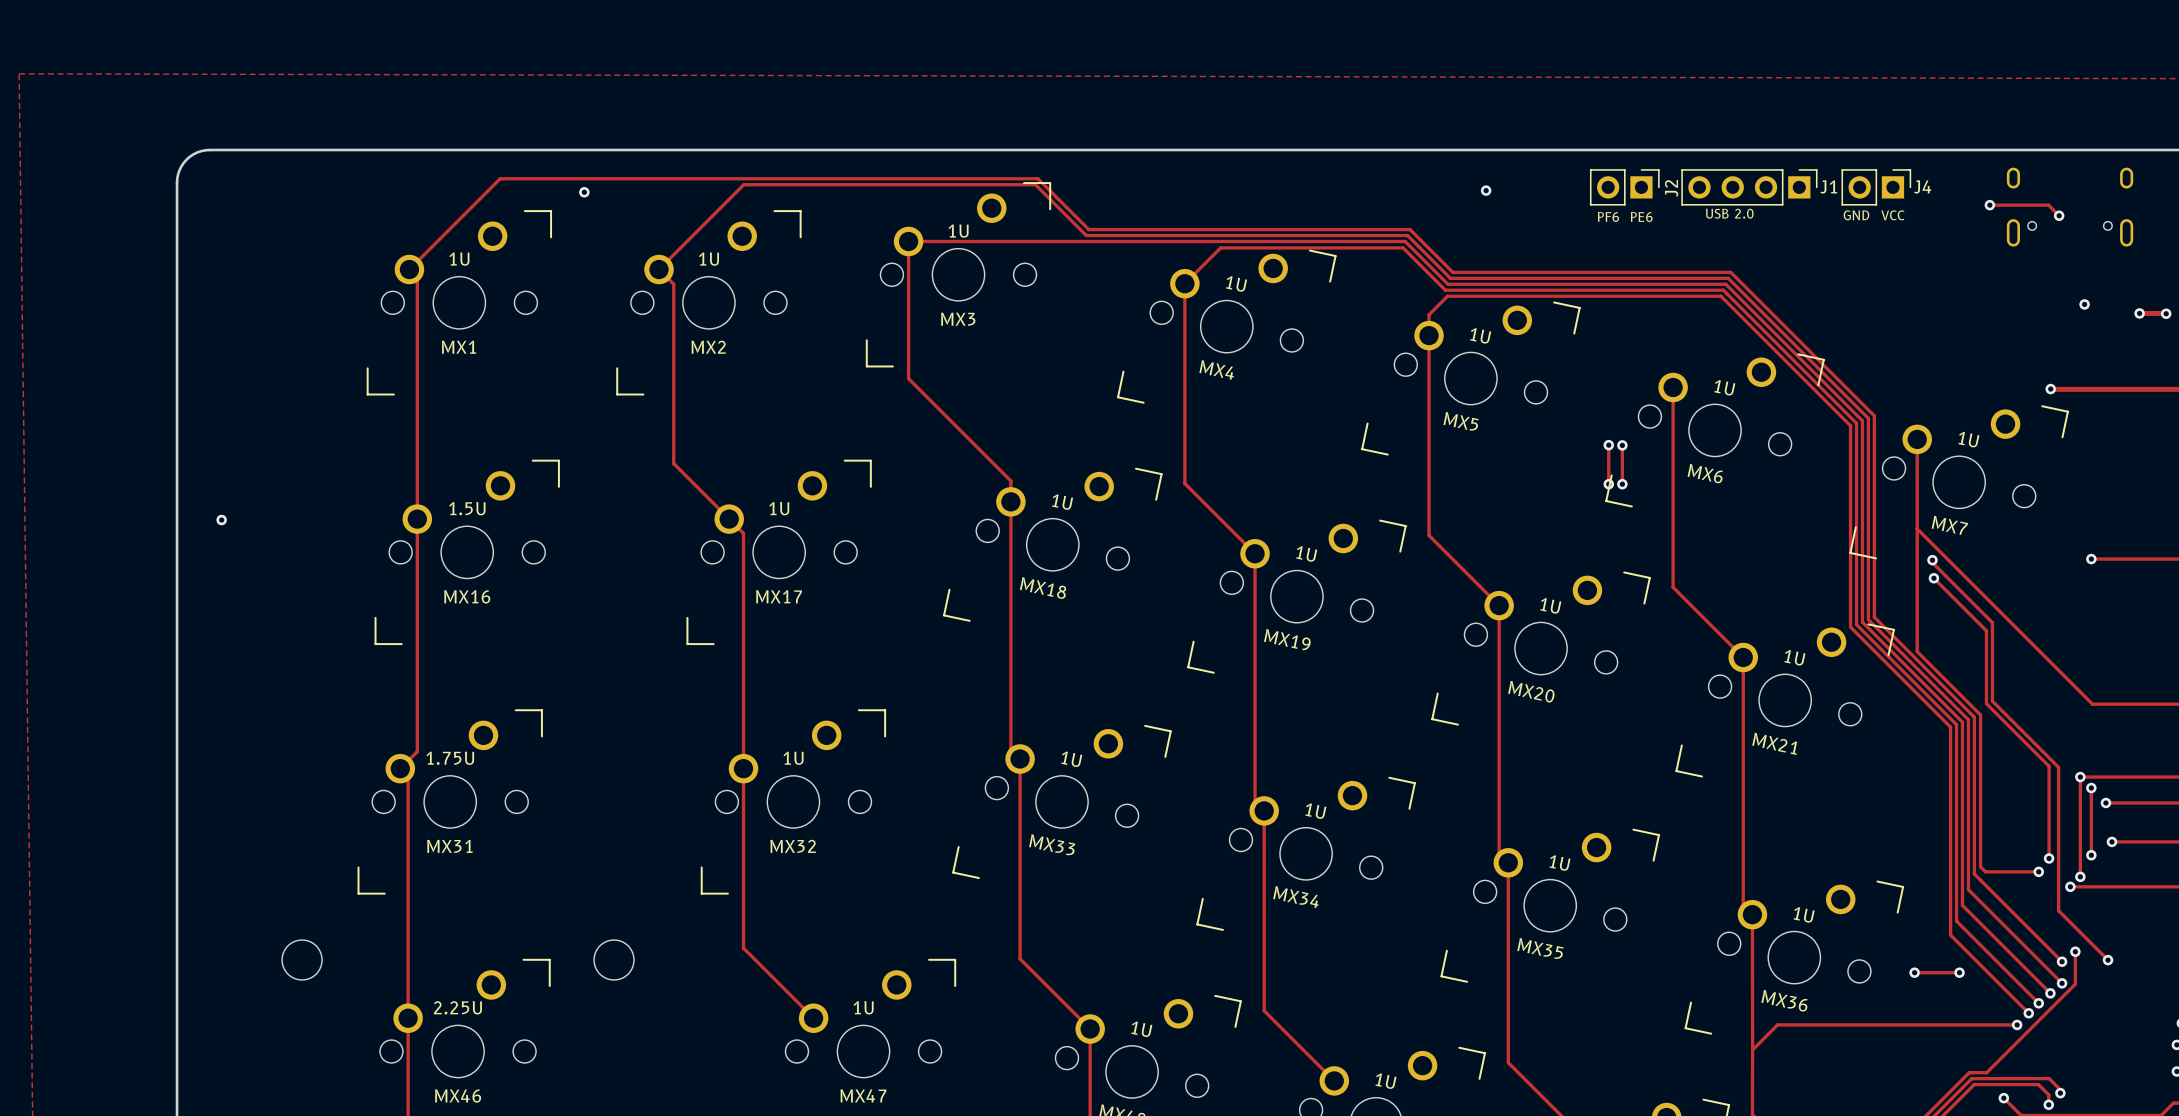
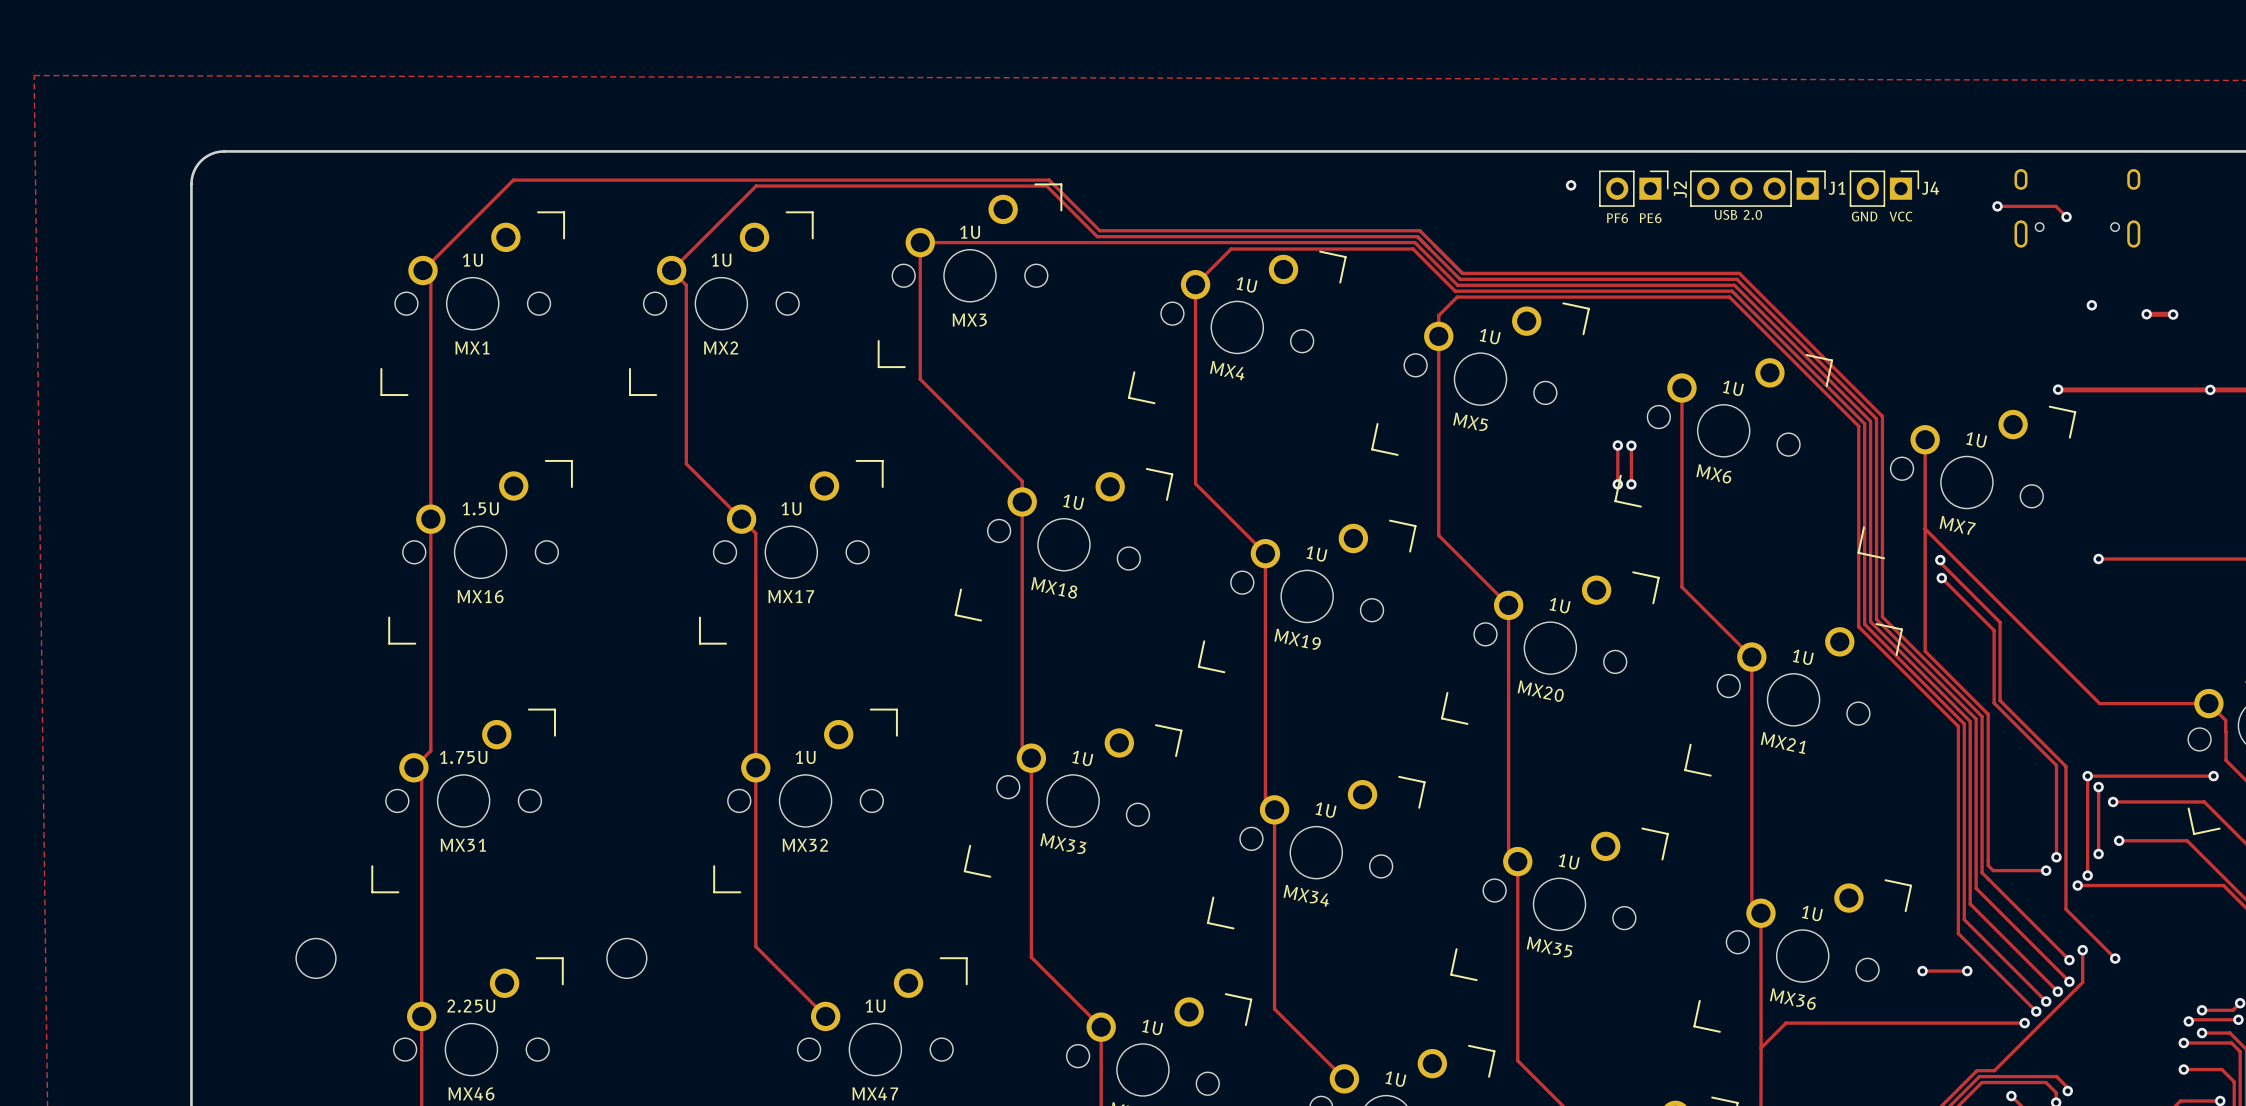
via position: (1486, 190) -> (1571, 185)
via: (584, 192) -> none
via: (221, 520) -> none

